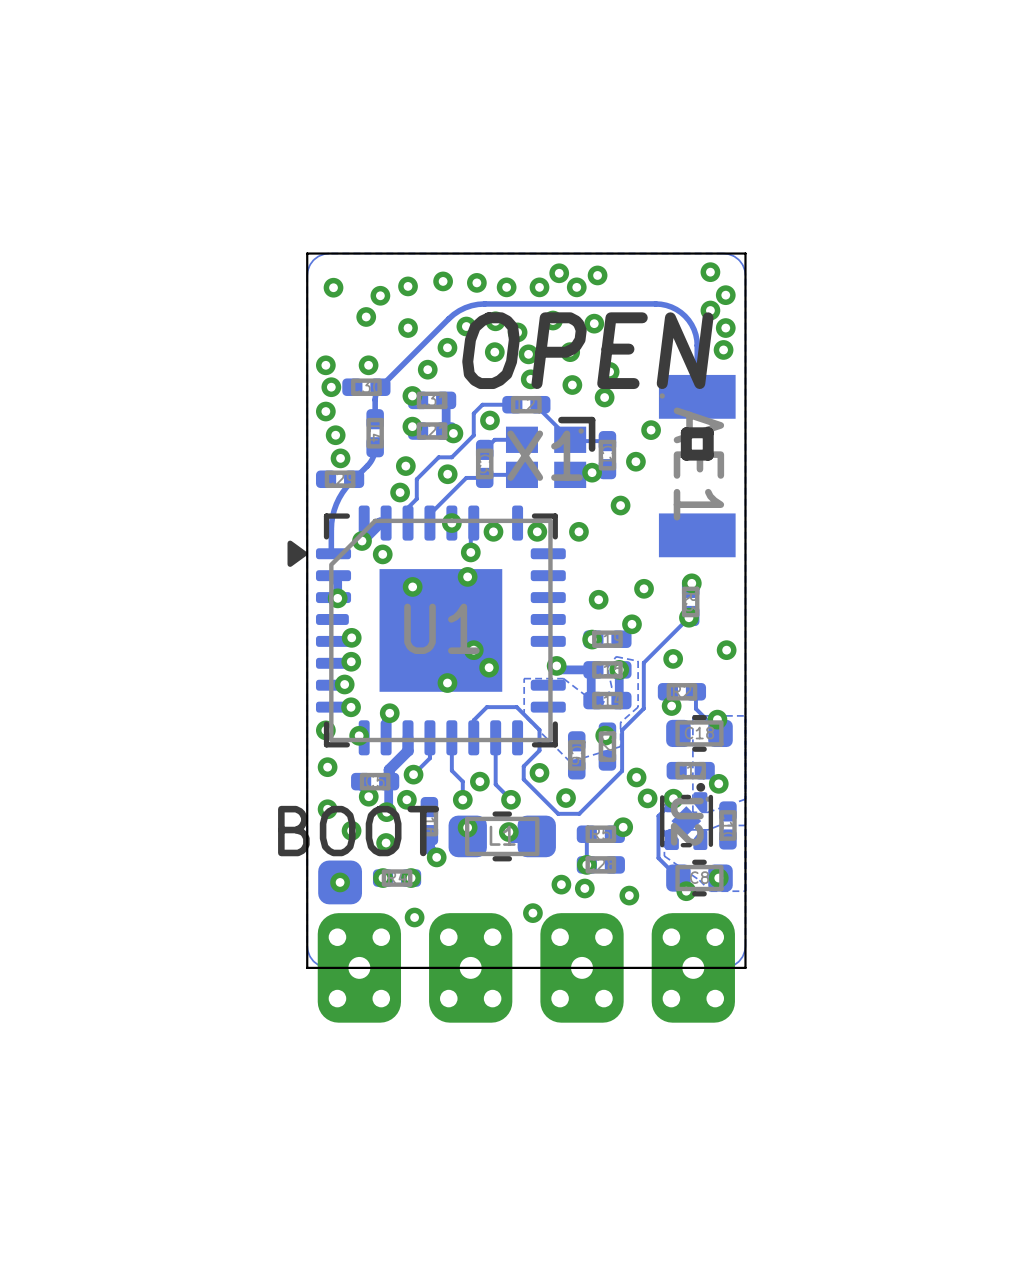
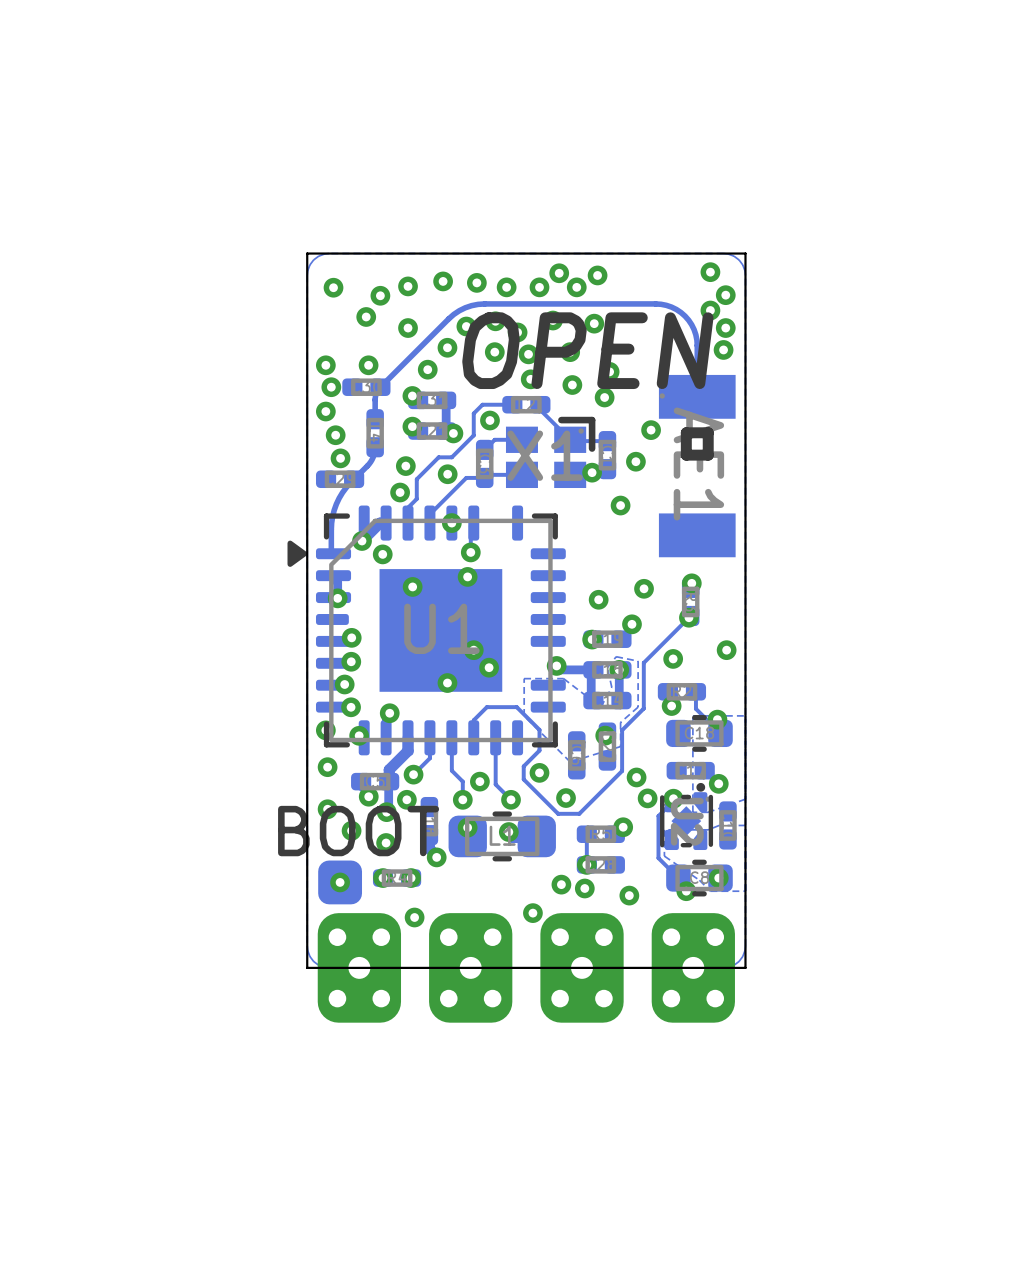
via: (493, 531) -> none
via: (537, 531) -> none
via: (578, 531) -> none

